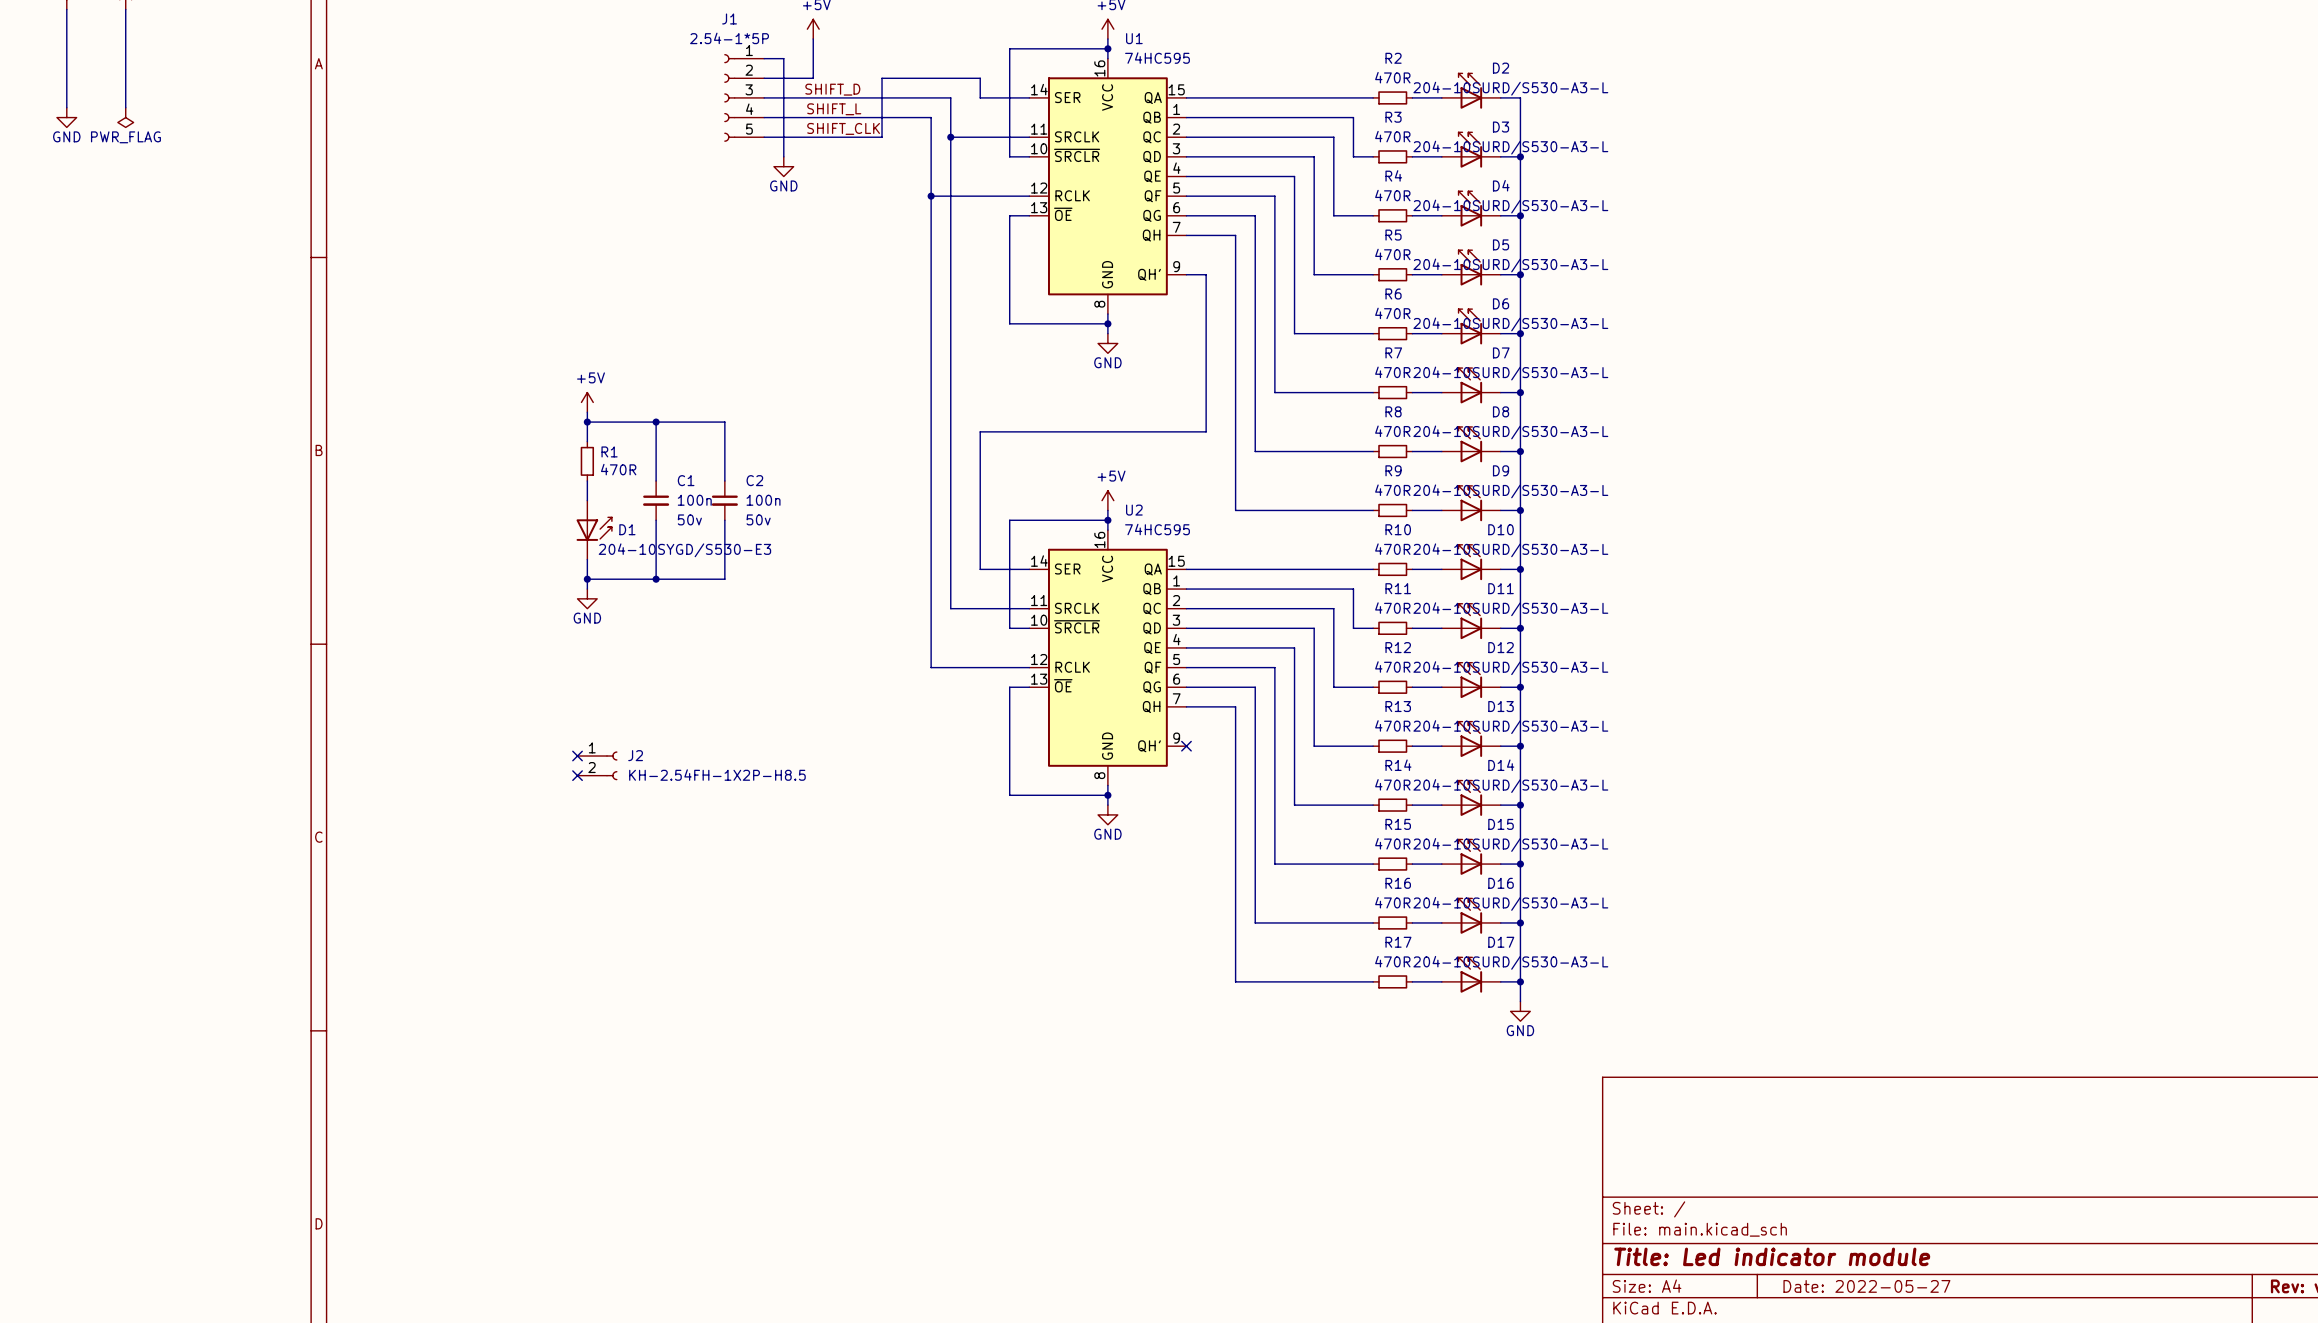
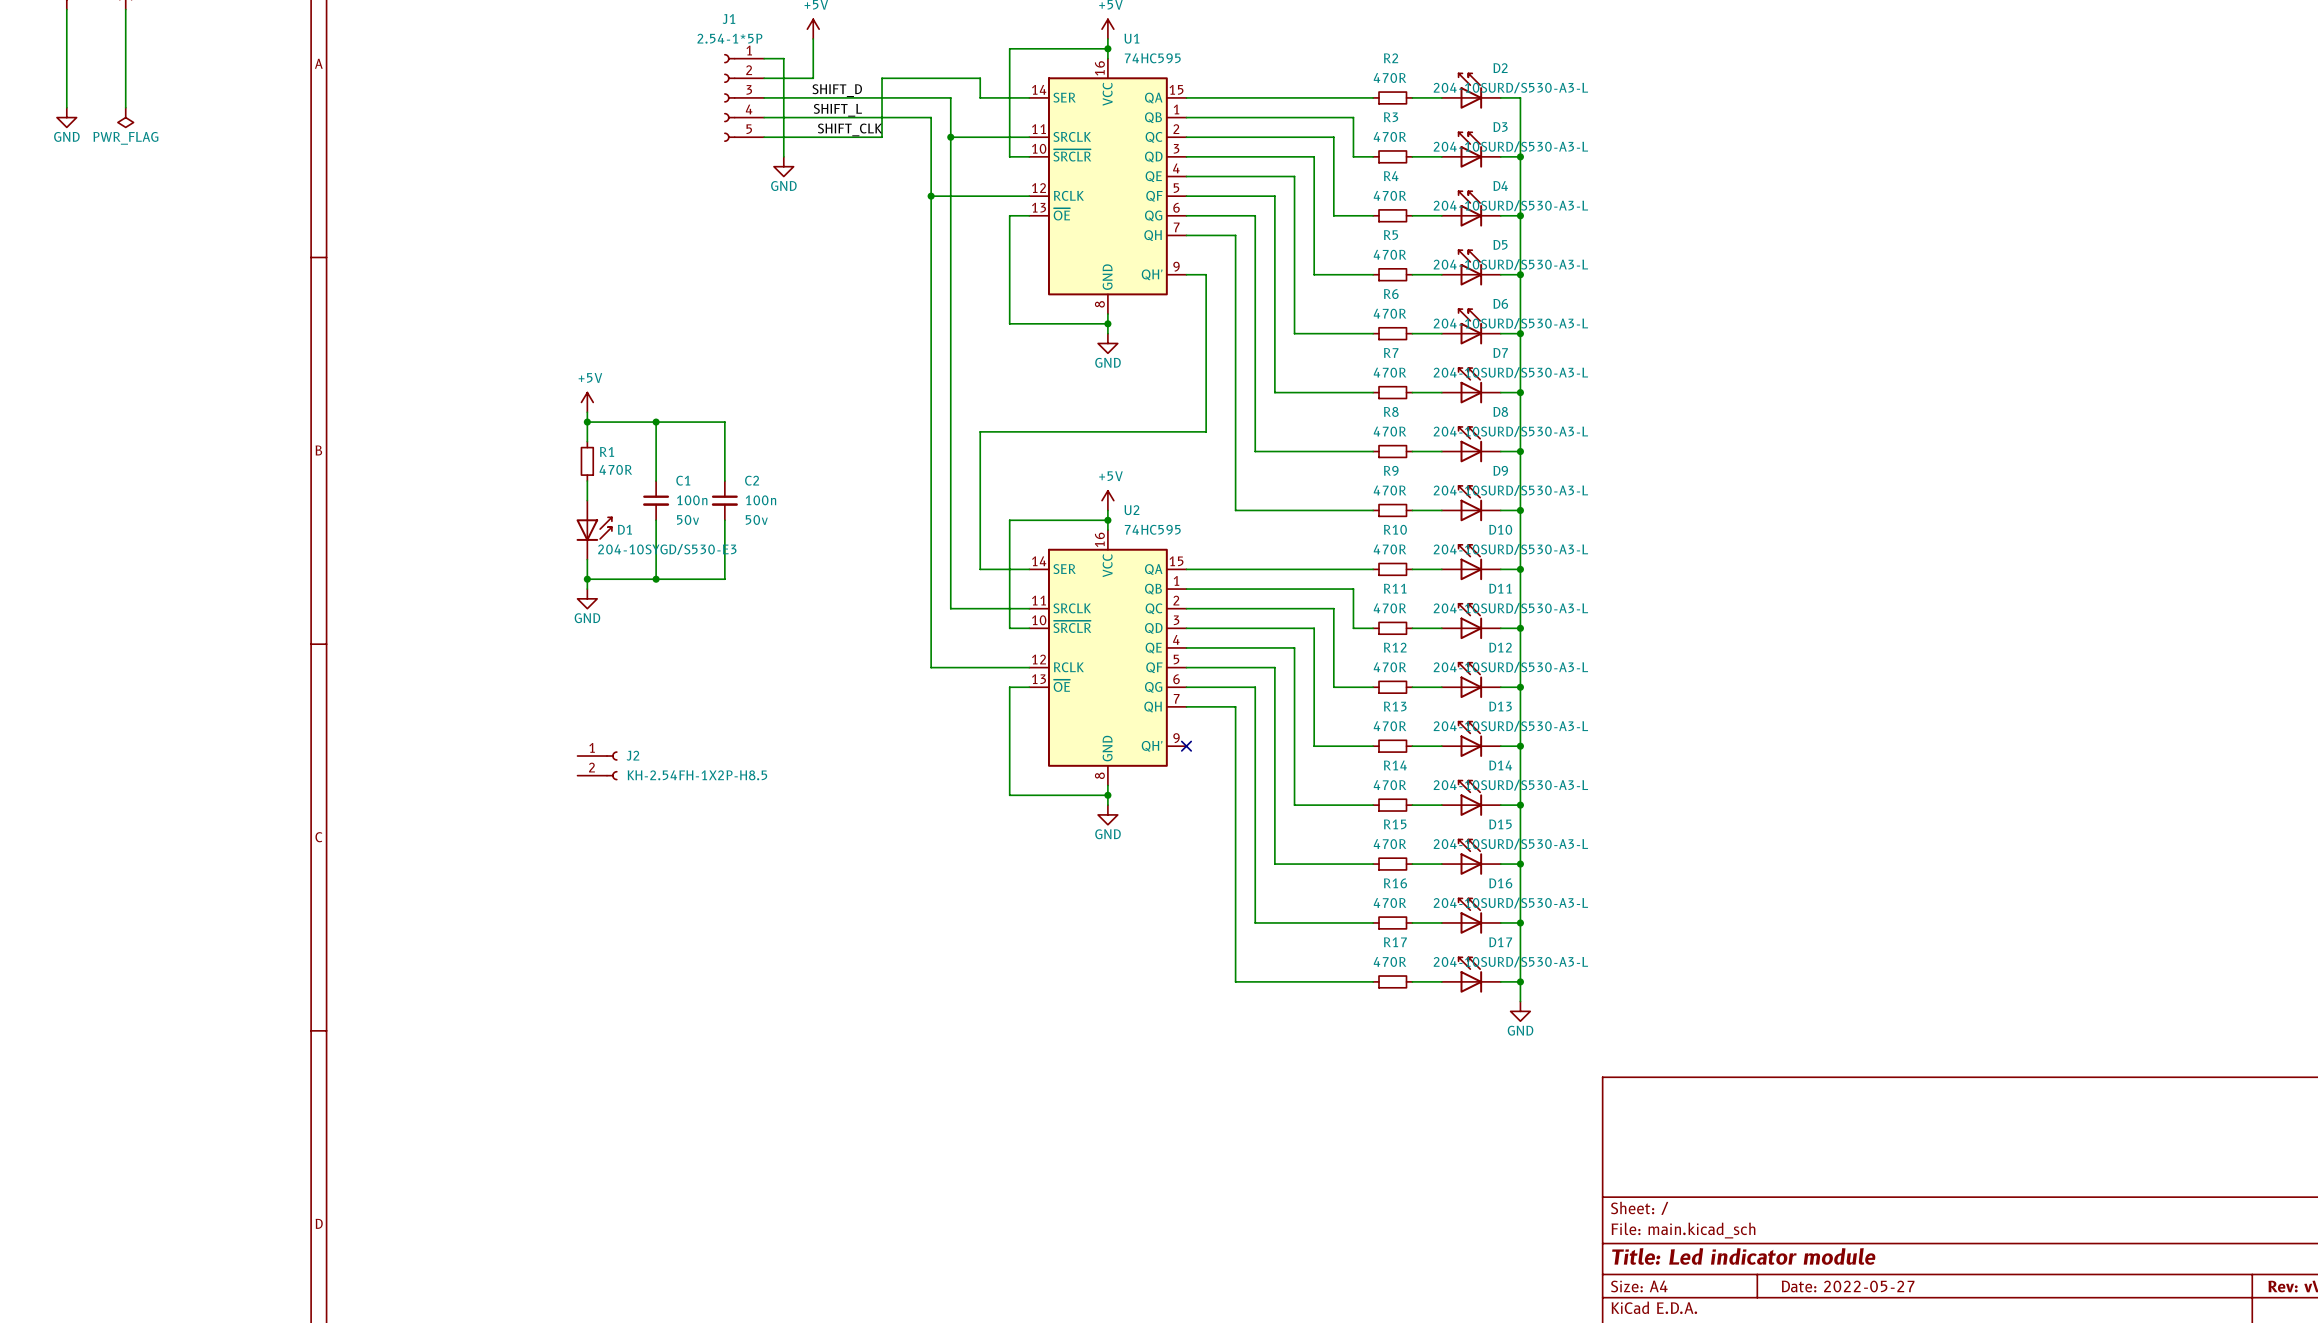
no-connect mark: (577, 756) -> none
no-connect mark: (577, 775) -> none

